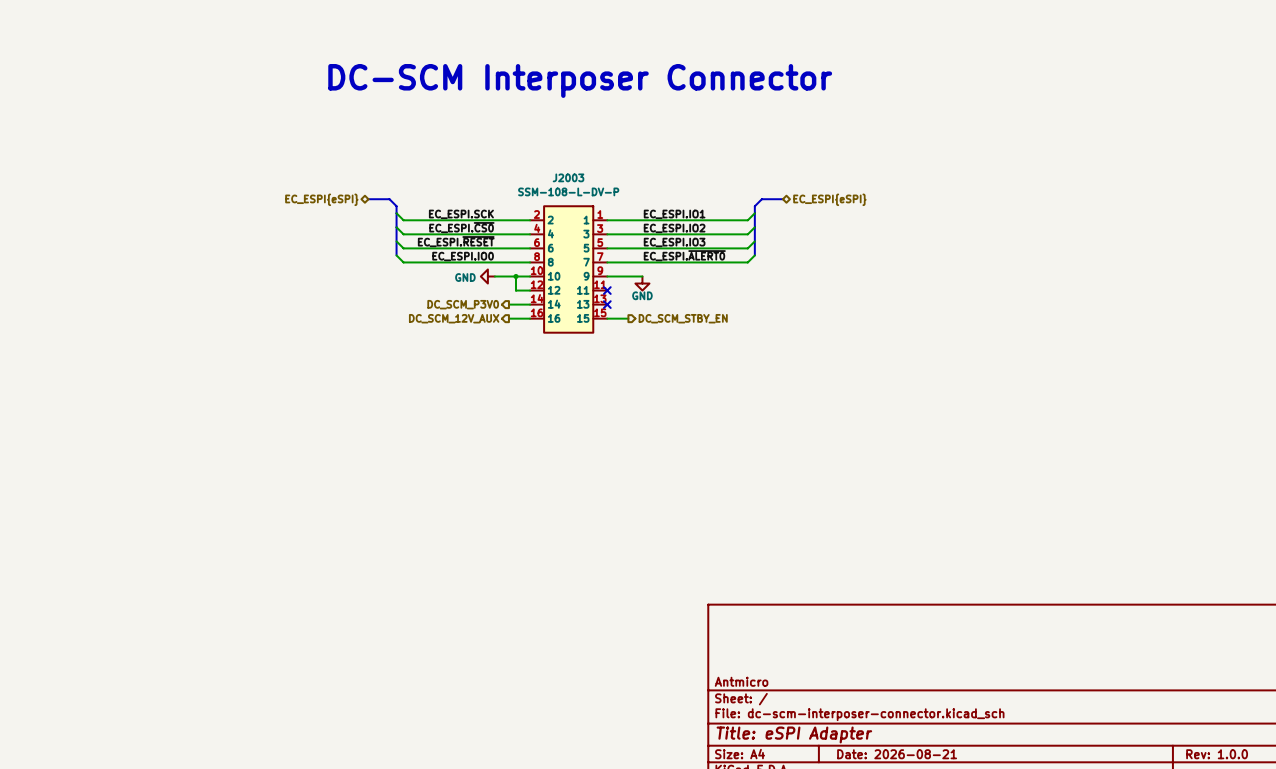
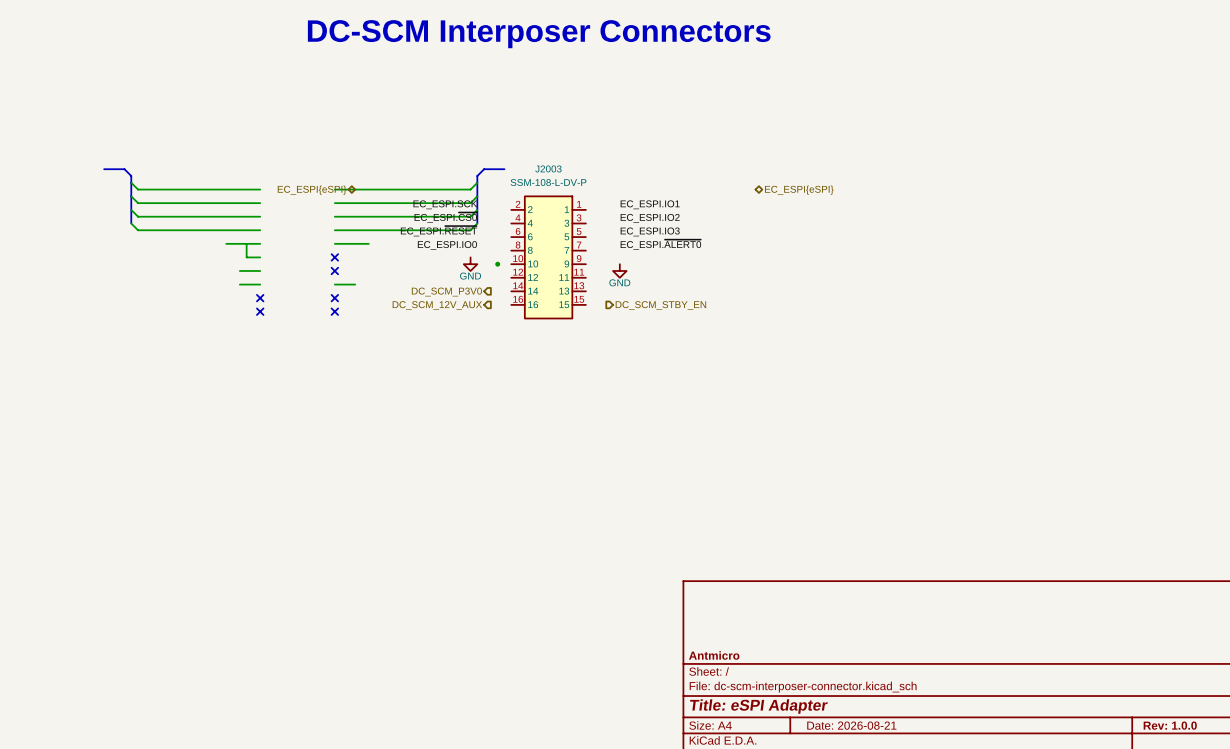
text: DC-SCM Interposer Connector (580, 80) -> DC-SCM Interposer Connectors (539, 34)
bus: none -> (104, 169) (124, 169) (131, 175) (131, 223)
bus: none -> (504, 169) (484, 169) (477, 175) (477, 223)
wire: none -> (131, 182) (138, 189) (260, 189)
wire: none -> (477, 182) (470, 189) (334, 189)
bus: (368, 199) (389, 199) (396, 206) (396, 255) -> none
bus: (782, 199) (761, 199) (754, 206) (754, 255) -> none
wire: none -> (131, 196) (138, 203) (260, 203)
wire: none -> (477, 196) (470, 203) (334, 203)
wire: (396, 213) (403, 220) (530, 220) -> none
wire: (754, 213) (747, 220) (607, 220) -> none
wire: none -> (131, 209) (138, 216) (260, 216)
wire: none -> (477, 209) (470, 216) (334, 216)
wire: (396, 227) (403, 234) (530, 234) -> none
wire: (754, 227) (747, 234) (607, 234) -> none
wire: none -> (131, 223) (138, 230) (260, 230)
wire: none -> (477, 223) (470, 230) (334, 230)
wire: (396, 241) (403, 248) (530, 248) -> none
wire: (754, 241) (747, 248) (607, 248) -> none
wire: none -> (226, 243) (260, 243)
wire: none -> (246, 243) (246, 257) (260, 257)
wire: none -> (334, 243) (368, 243)
wire: (396, 255) (403, 262) (530, 262) -> none
wire: (754, 255) (747, 262) (607, 262) -> none
no-connect mark: none -> (334, 257)
power symbol rotation: 0° (487, 276) -> 90° counterclockwise (470, 264)
wire: (494, 276) (530, 276) -> none
wire: (515, 276) (515, 290) (530, 290) -> none
wire: (607, 276) (642, 276) -> none
wire: none -> (239, 270) (260, 270)
no-connect mark: none -> (334, 270)
no-connect mark: (607, 290) -> none
wire: none -> (239, 284) (260, 284)
wire: none -> (334, 284) (355, 284)
wire: (508, 304) (530, 304) -> none
no-connect mark: (607, 304) -> none
no-connect mark: none -> (260, 298)
no-connect mark: none -> (334, 298)
wire: (508, 318) (530, 318) -> none
wire: (607, 318) (628, 318) -> none
no-connect mark: none -> (260, 311)
no-connect mark: none -> (334, 311)

